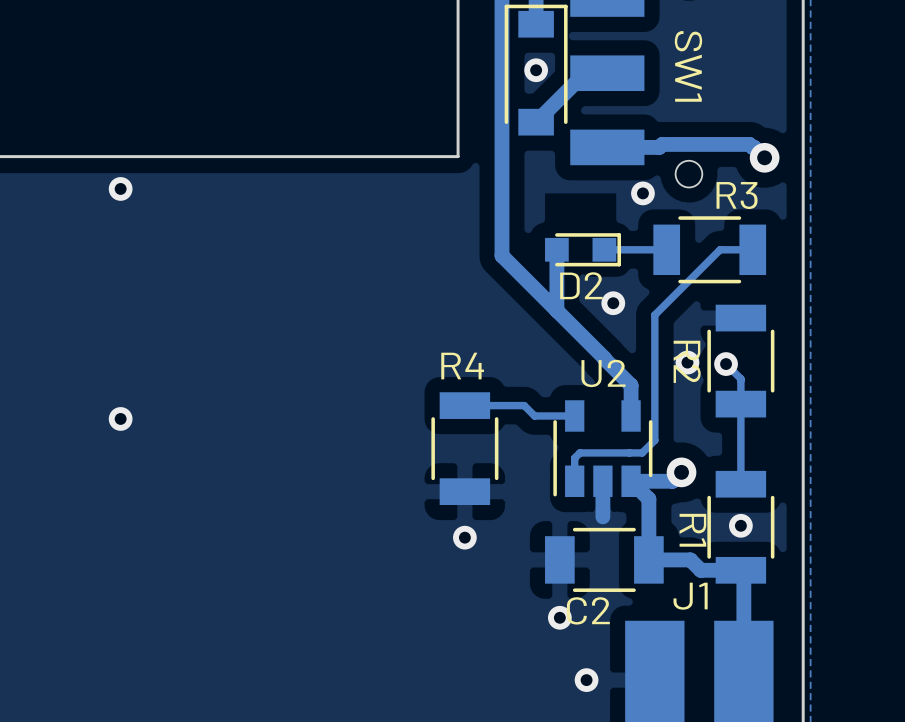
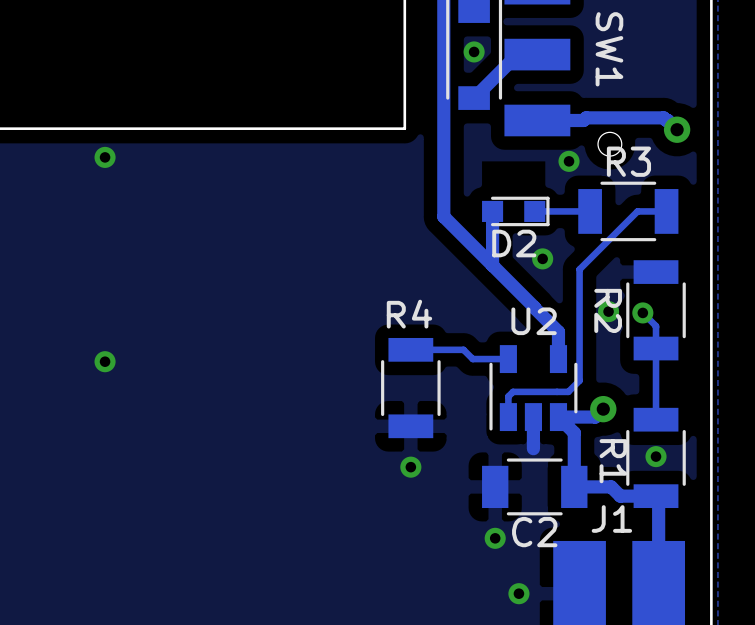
R3 name position: R3 (737, 195) -> R3 (628, 161)
C2 name position: C2 (588, 610) -> C2 (534, 532)

